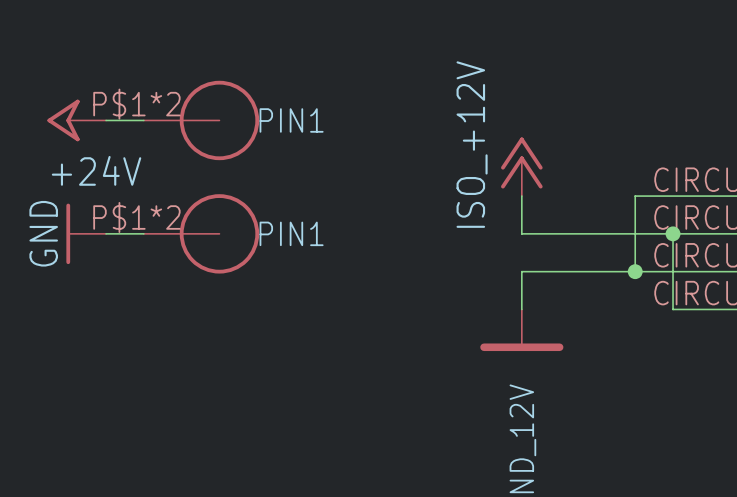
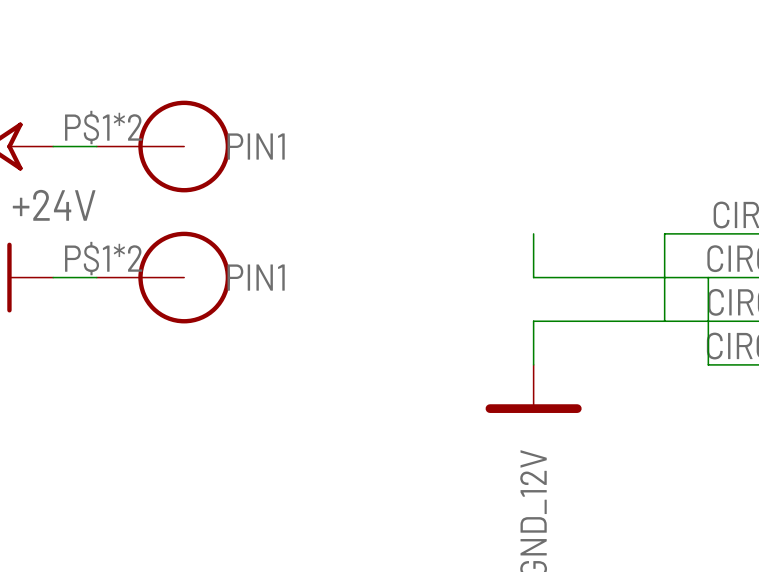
power symbol: ISO_+12V (521, 166) -> none
junction: (673, 233) -> none
junction: (635, 271) -> none

